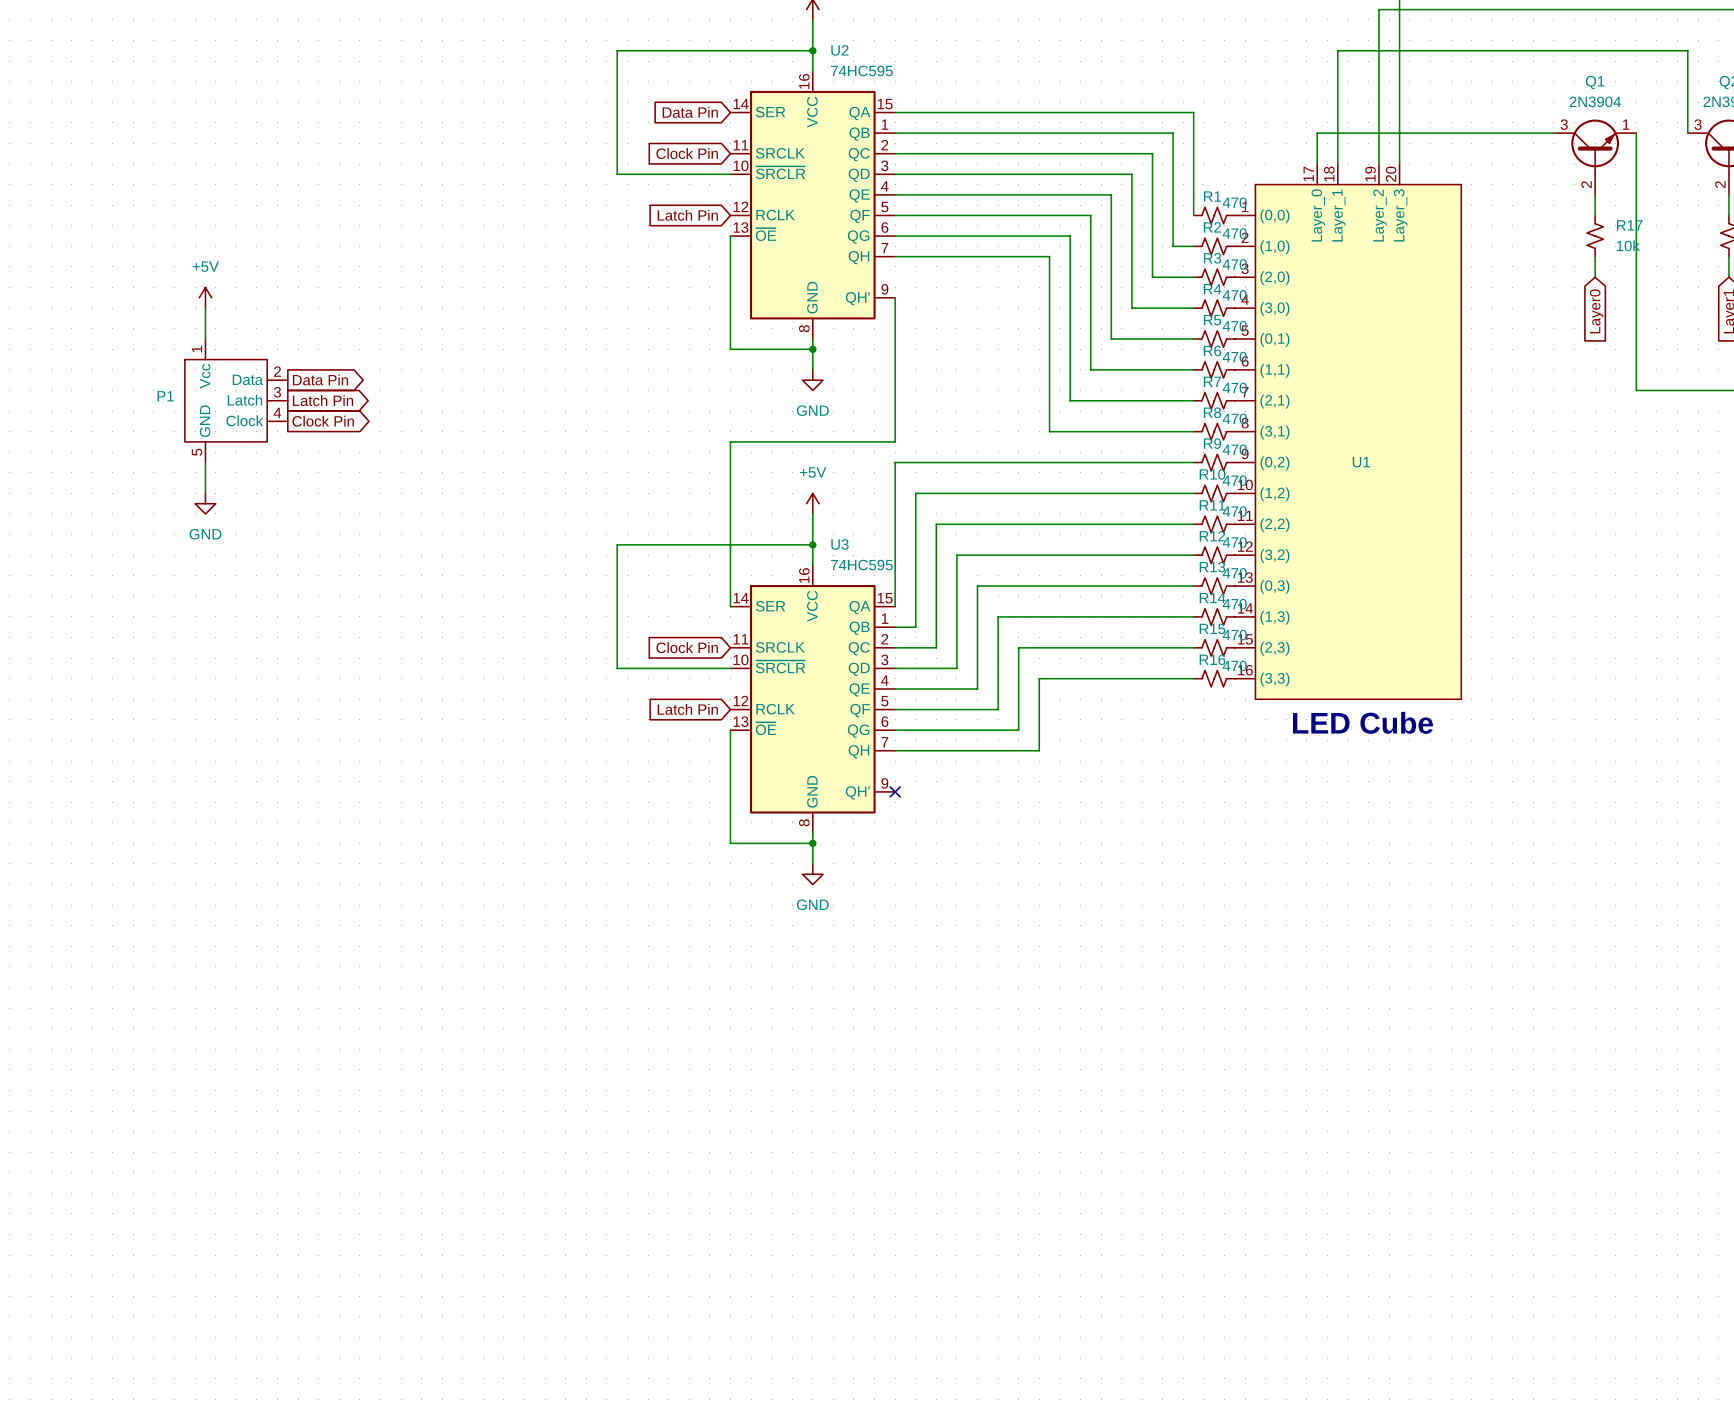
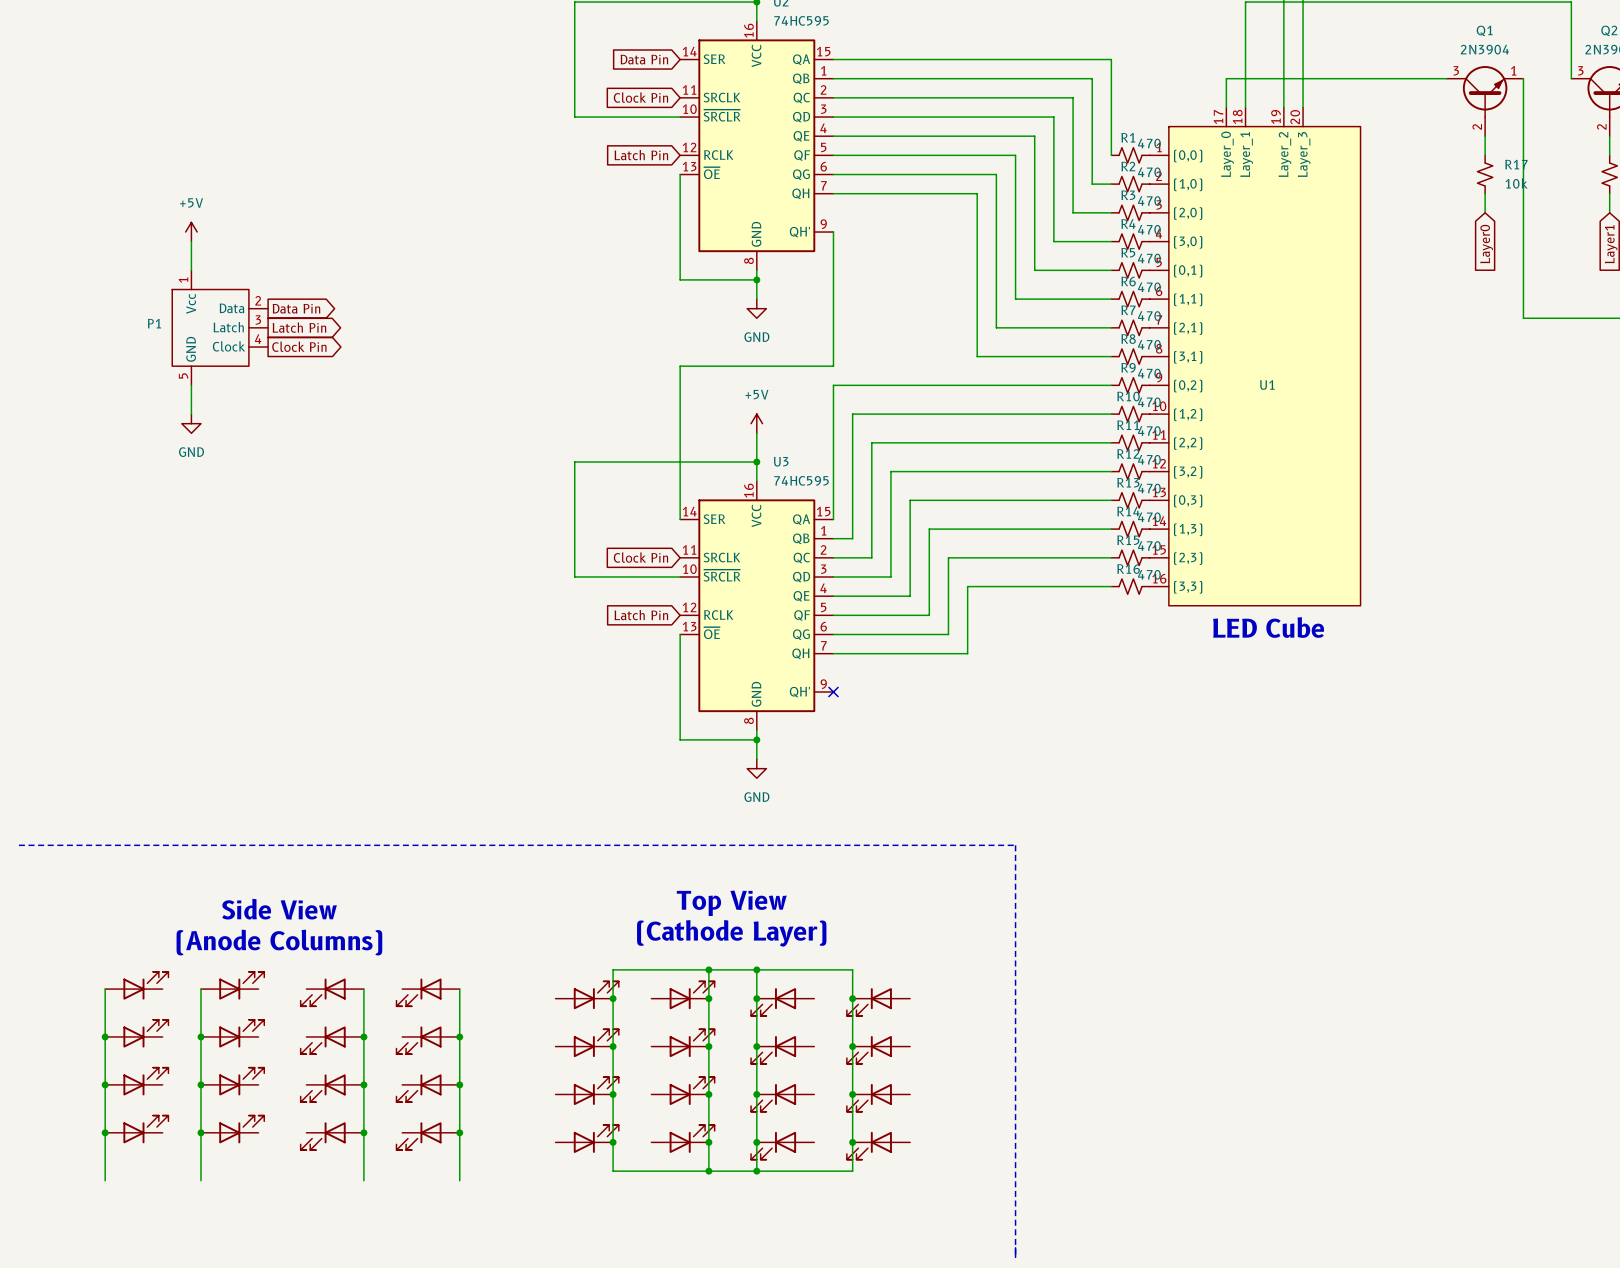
line: none -> (18, 845) (1015, 845) (1015, 1257) (1015, 1247)
text: none -> Top View (731, 903)
text: none -> Side View (279, 909)
text: none -> (Cathode Layer) (731, 933)
text: none -> (Anode Columns) (279, 942)
wire: none -> (613, 969) (613, 1171) (852, 1171) (852, 969) (613, 969)
wire: none -> (708, 969) (708, 1171)
junction: none -> (708, 969)
wire: none -> (756, 969) (756, 1171)
junction: none -> (756, 969)
part: none -> (136, 985)
part: none -> (232, 985)
wire: none -> (105, 989) (105, 1180)
wire: none -> (201, 989) (201, 1180)
wire: none -> (363, 989) (363, 1180)
wire: none -> (459, 989) (459, 1180)
part: none -> (332, 992)
part: none -> (428, 992)
part: none -> (587, 995)
part: none -> (683, 995)
junction: none -> (613, 998)
junction: none -> (708, 998)
junction: none -> (756, 998)
junction: none -> (852, 998)
part: none -> (782, 1002)
part: none -> (878, 1002)
part: none -> (136, 1033)
part: none -> (232, 1033)
junction: none -> (105, 1036)
junction: none -> (201, 1036)
junction: none -> (363, 1036)
junction: none -> (459, 1036)
part: none -> (332, 1040)
part: none -> (428, 1040)
part: none -> (587, 1043)
part: none -> (683, 1043)
junction: none -> (613, 1046)
junction: none -> (708, 1046)
junction: none -> (756, 1046)
junction: none -> (852, 1046)
part: none -> (782, 1049)
part: none -> (878, 1049)
part: none -> (136, 1081)
part: none -> (232, 1081)
junction: none -> (105, 1084)
junction: none -> (201, 1084)
junction: none -> (363, 1084)
junction: none -> (459, 1084)
part: none -> (332, 1088)
part: none -> (428, 1088)
part: none -> (587, 1091)
part: none -> (683, 1091)
junction: none -> (613, 1094)
junction: none -> (708, 1094)
junction: none -> (756, 1094)
junction: none -> (852, 1094)
part: none -> (782, 1097)
part: none -> (878, 1097)
part: none -> (136, 1129)
part: none -> (232, 1129)
junction: none -> (105, 1132)
junction: none -> (201, 1132)
junction: none -> (363, 1132)
junction: none -> (459, 1132)
part: none -> (332, 1136)
part: none -> (428, 1136)
part: none -> (587, 1139)
part: none -> (683, 1139)
junction: none -> (613, 1142)
junction: none -> (708, 1142)
junction: none -> (756, 1142)
junction: none -> (852, 1142)
part: none -> (782, 1145)
part: none -> (878, 1145)
junction: none -> (708, 1171)
junction: none -> (756, 1171)

